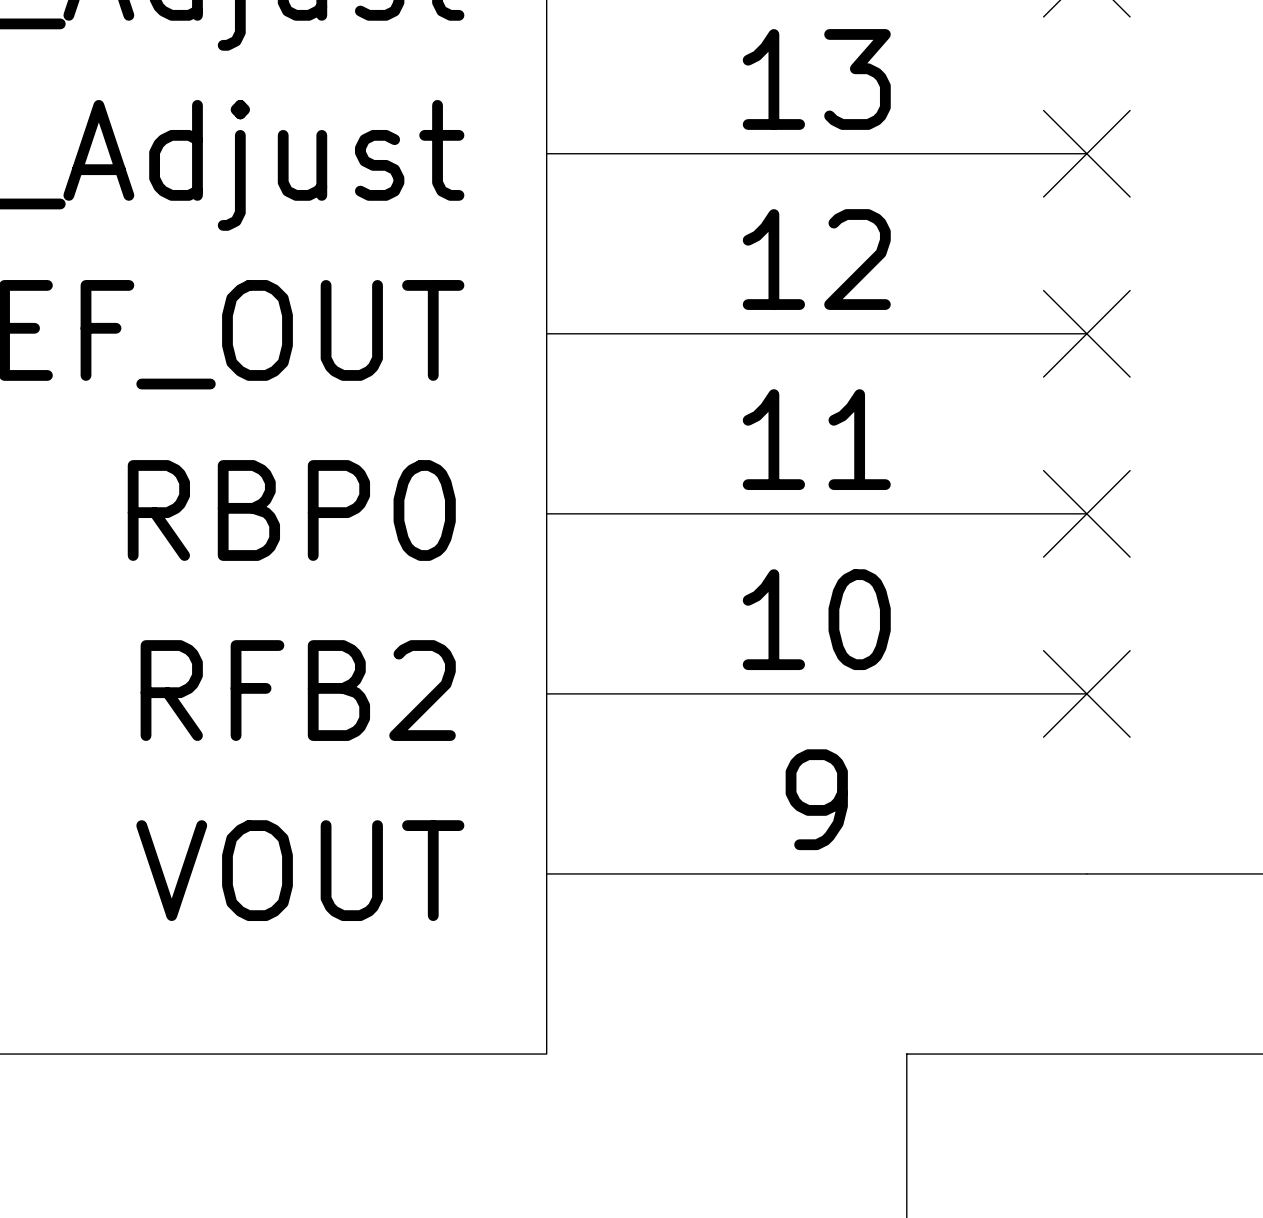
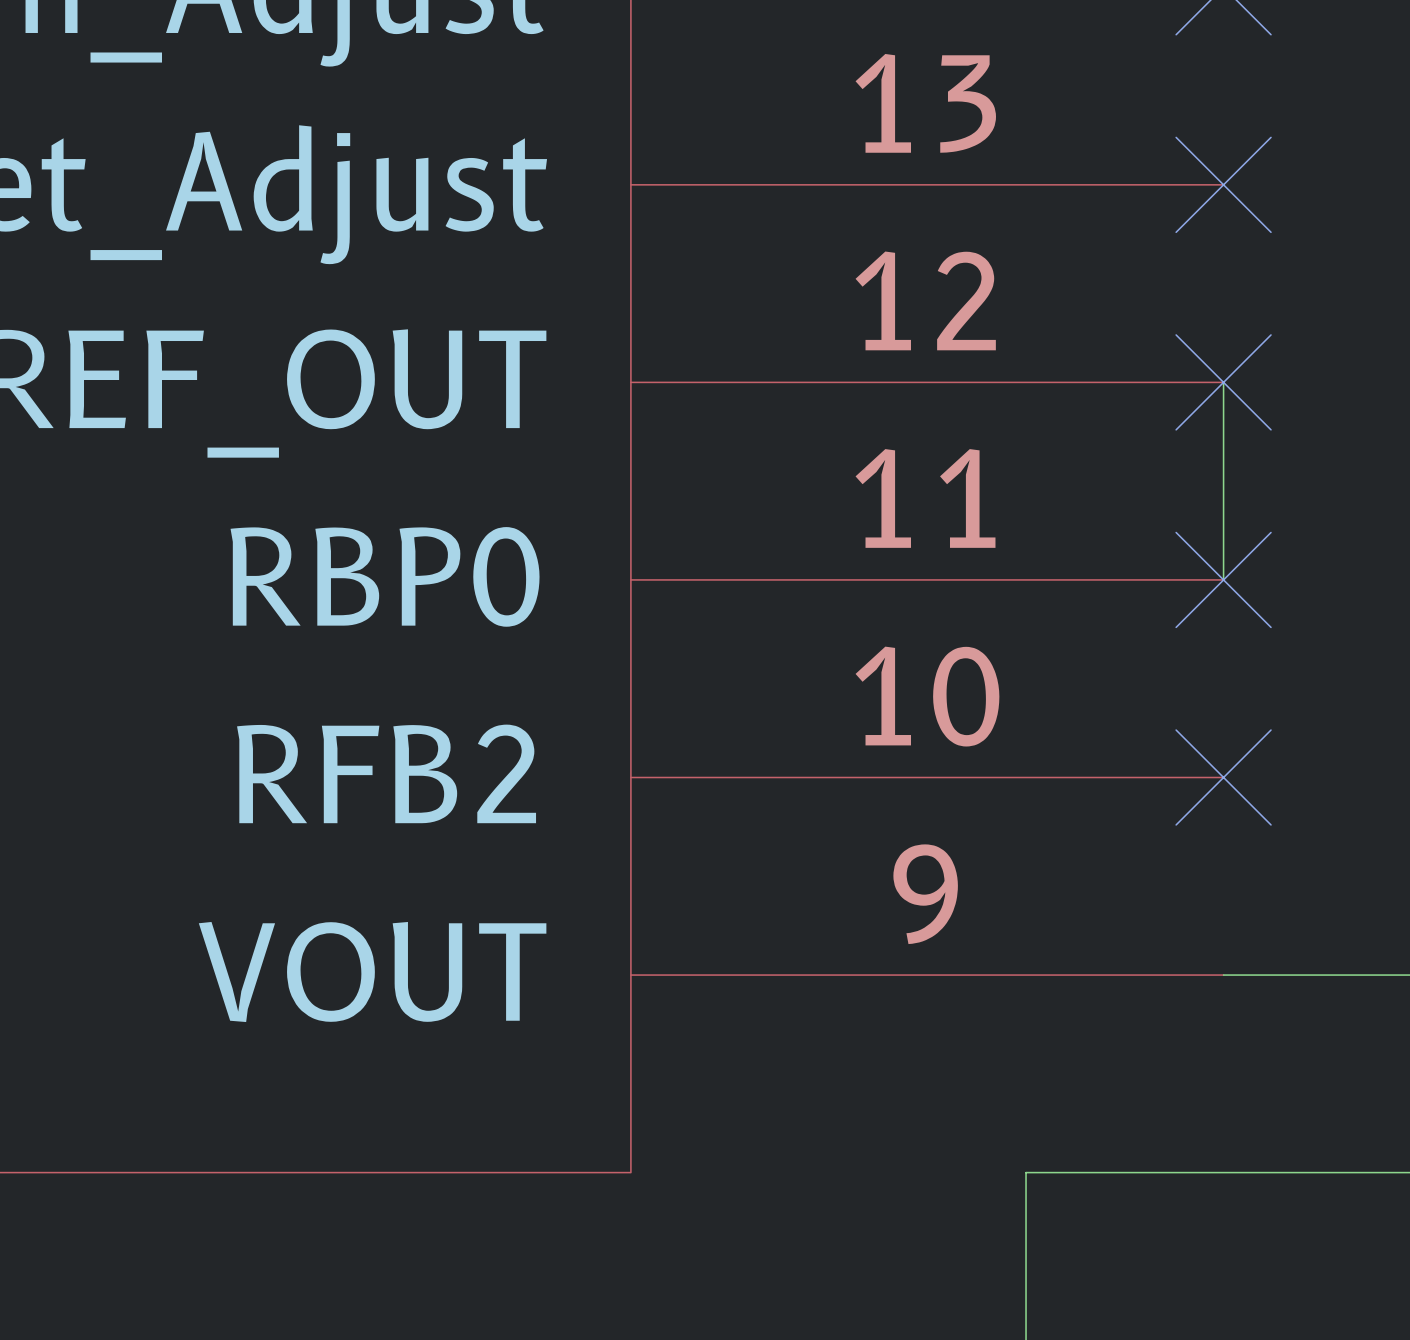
wire: none -> (1223, 382) (1223, 579)

